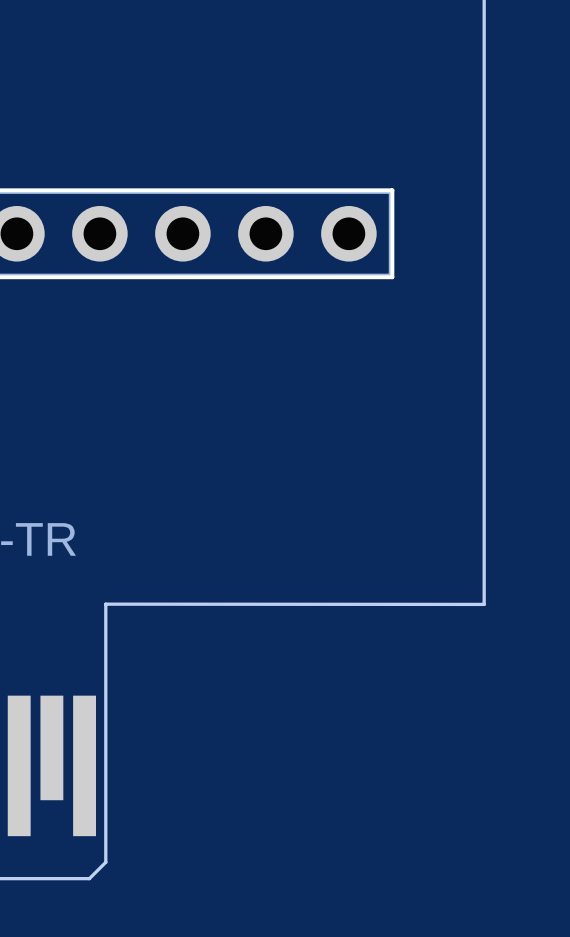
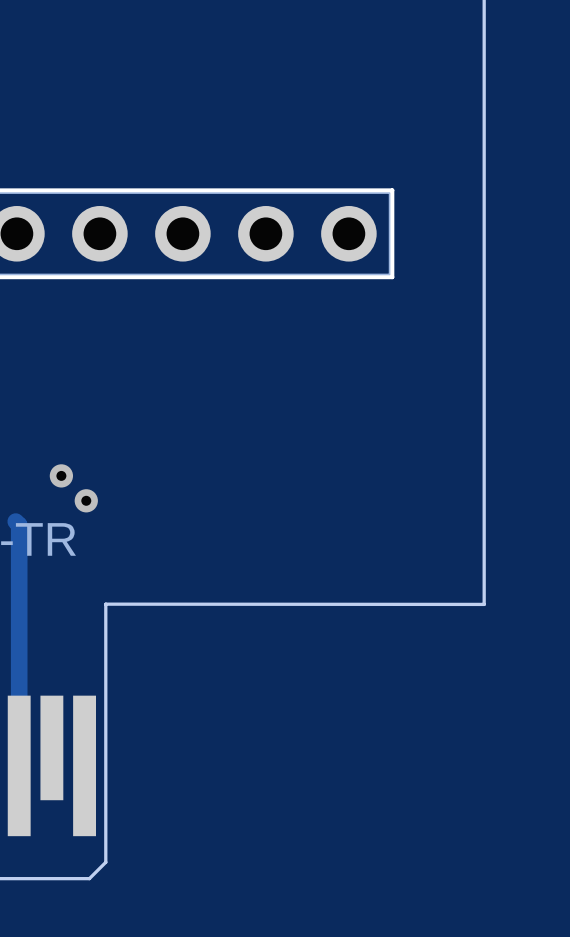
via: none -> (61, 475)
via: none -> (86, 500)
track: none -> (15, 521) (19, 525) (19, 765)

